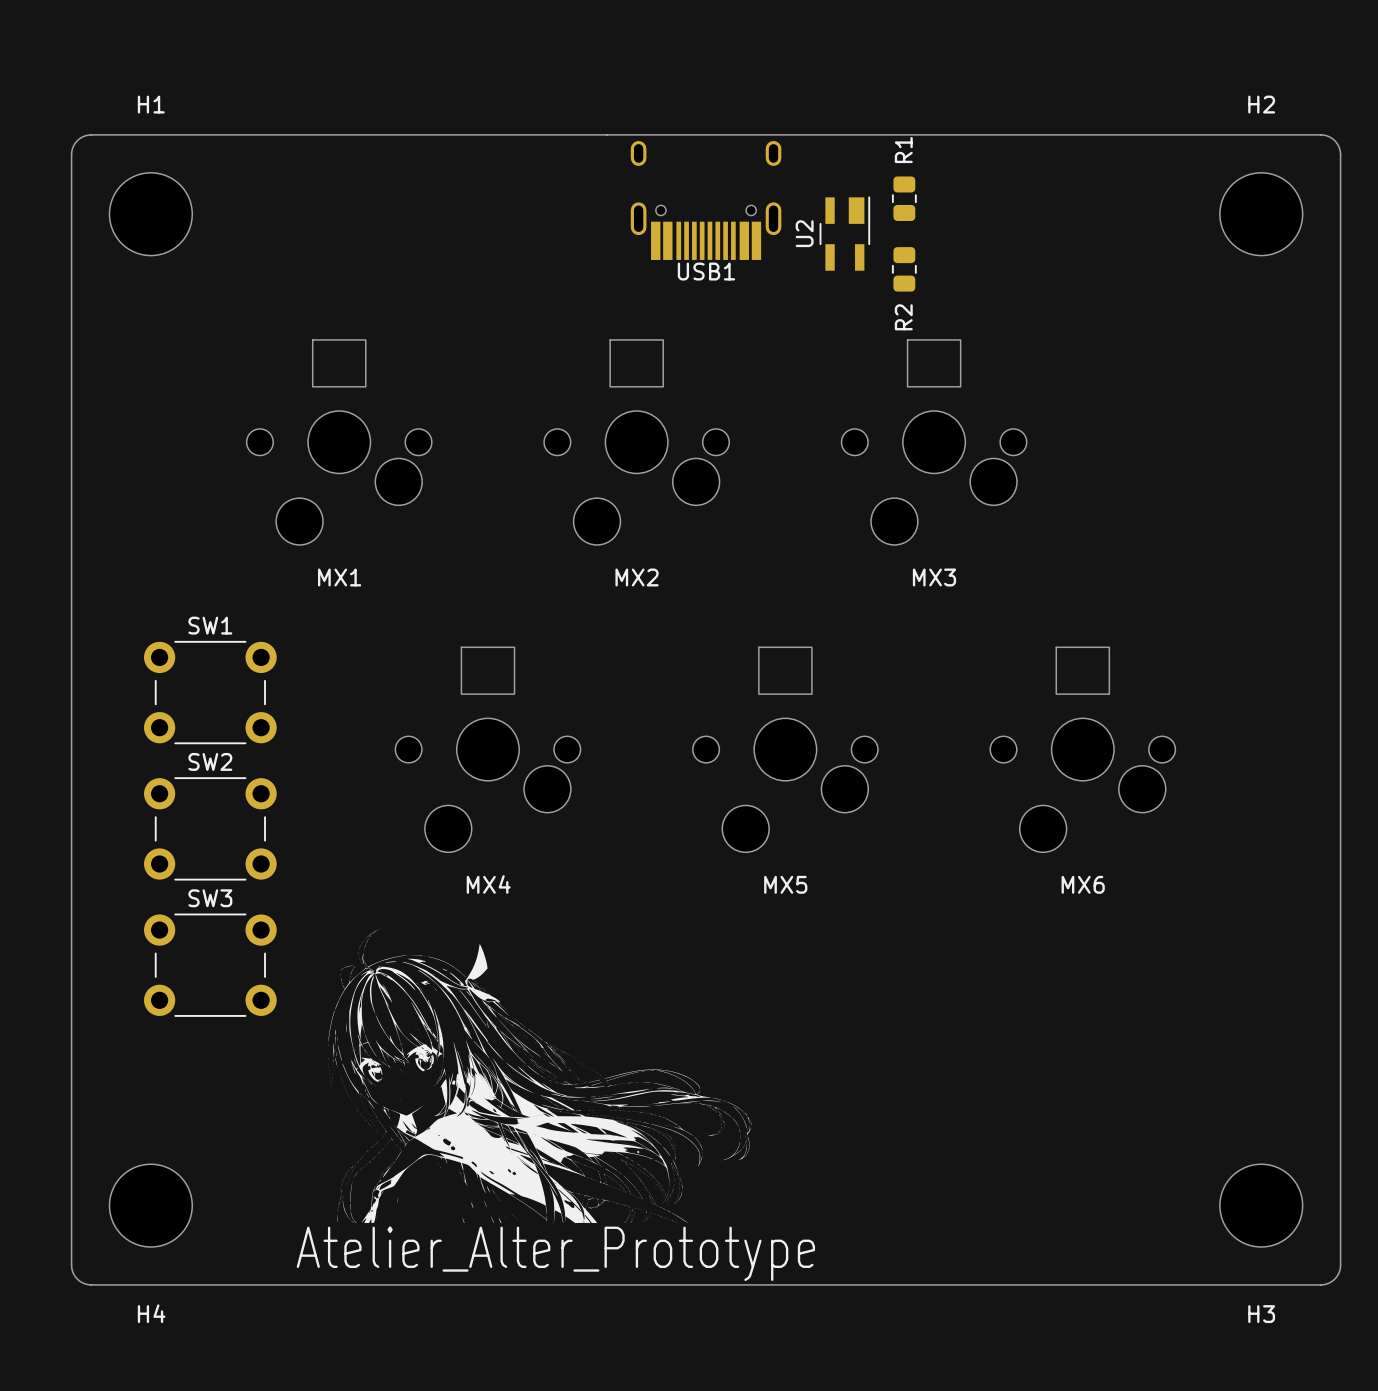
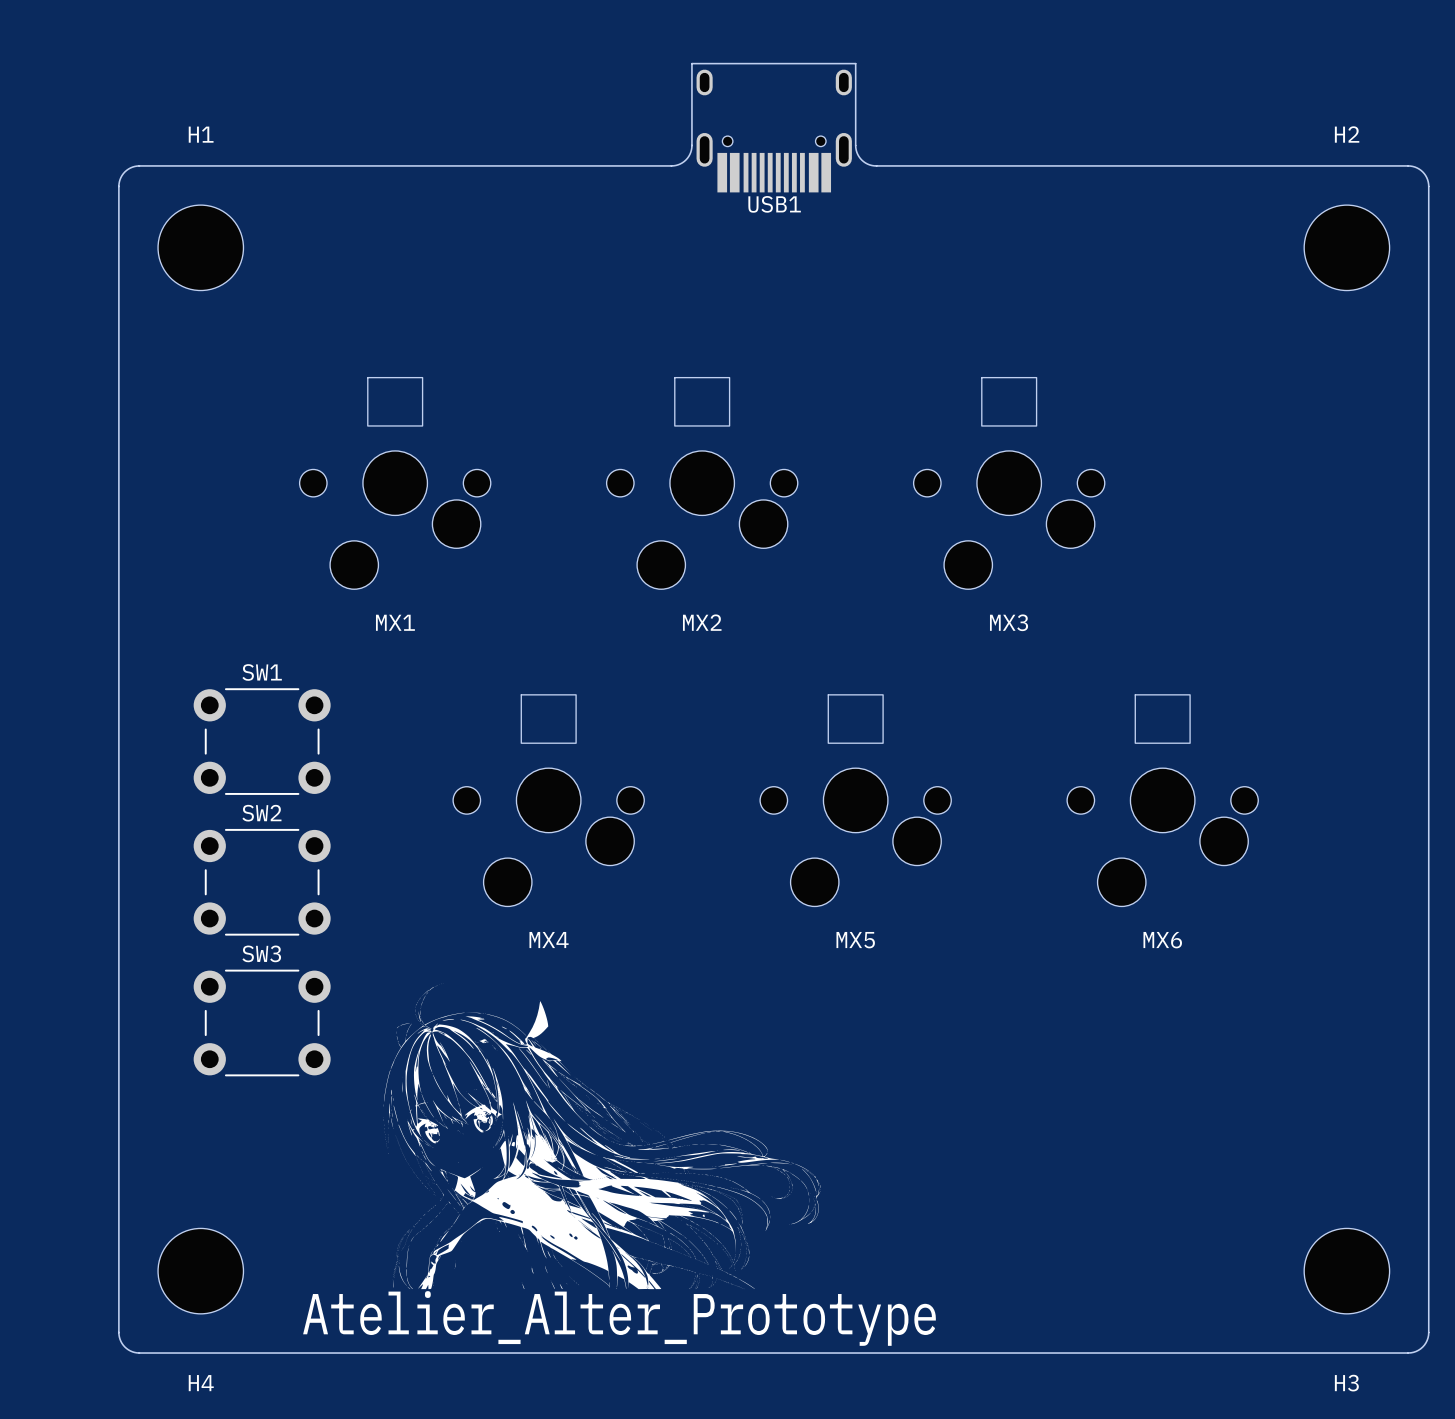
board edge: (606, 134) (805, 134) -> (671, 165) (684, 161) (691, 150) (691, 63) (855, 63) (856, 150) (863, 161) (876, 165)
R2: (904, 198) -> none
USB1 position: (706, 200) -> (774, 131)
U2: (844, 233) -> none
R1: (904, 269) -> none

